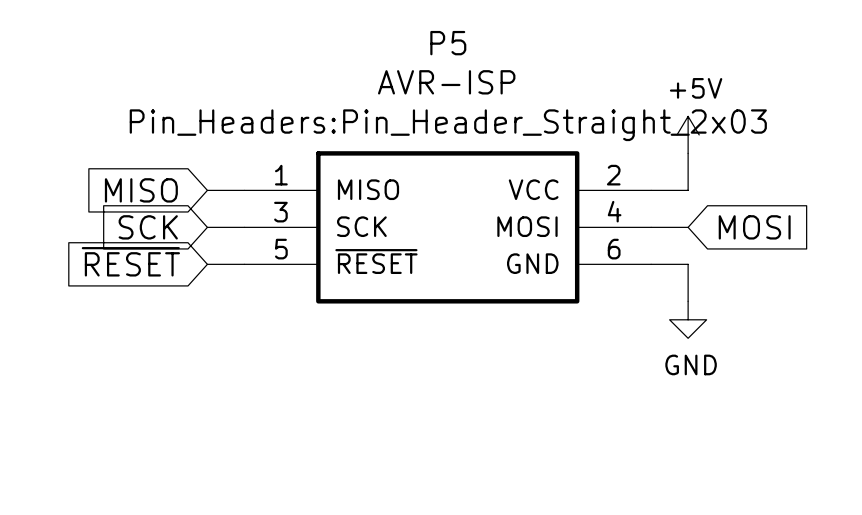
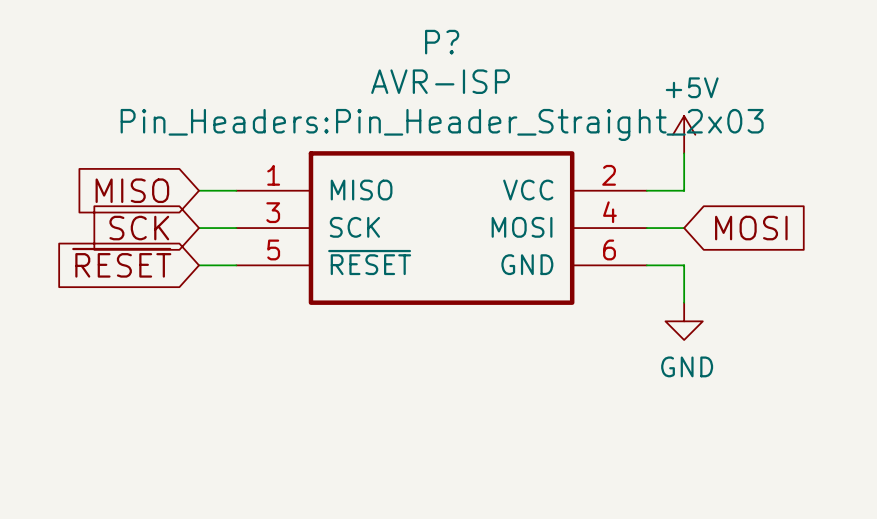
P5 name: P5 (448, 43) -> P? (442, 42)

